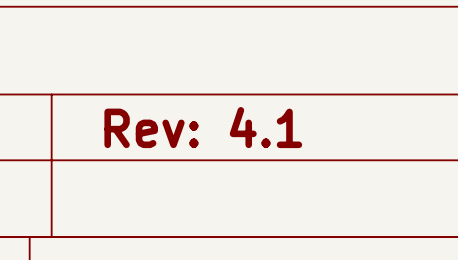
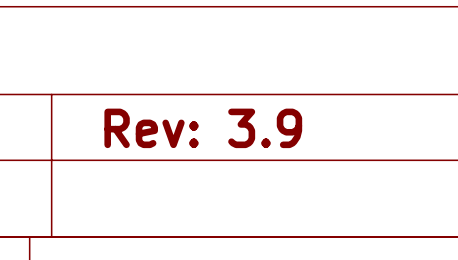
title block: Rev: 4.1 (203, 127) -> Rev: 3.9 (203, 128)

